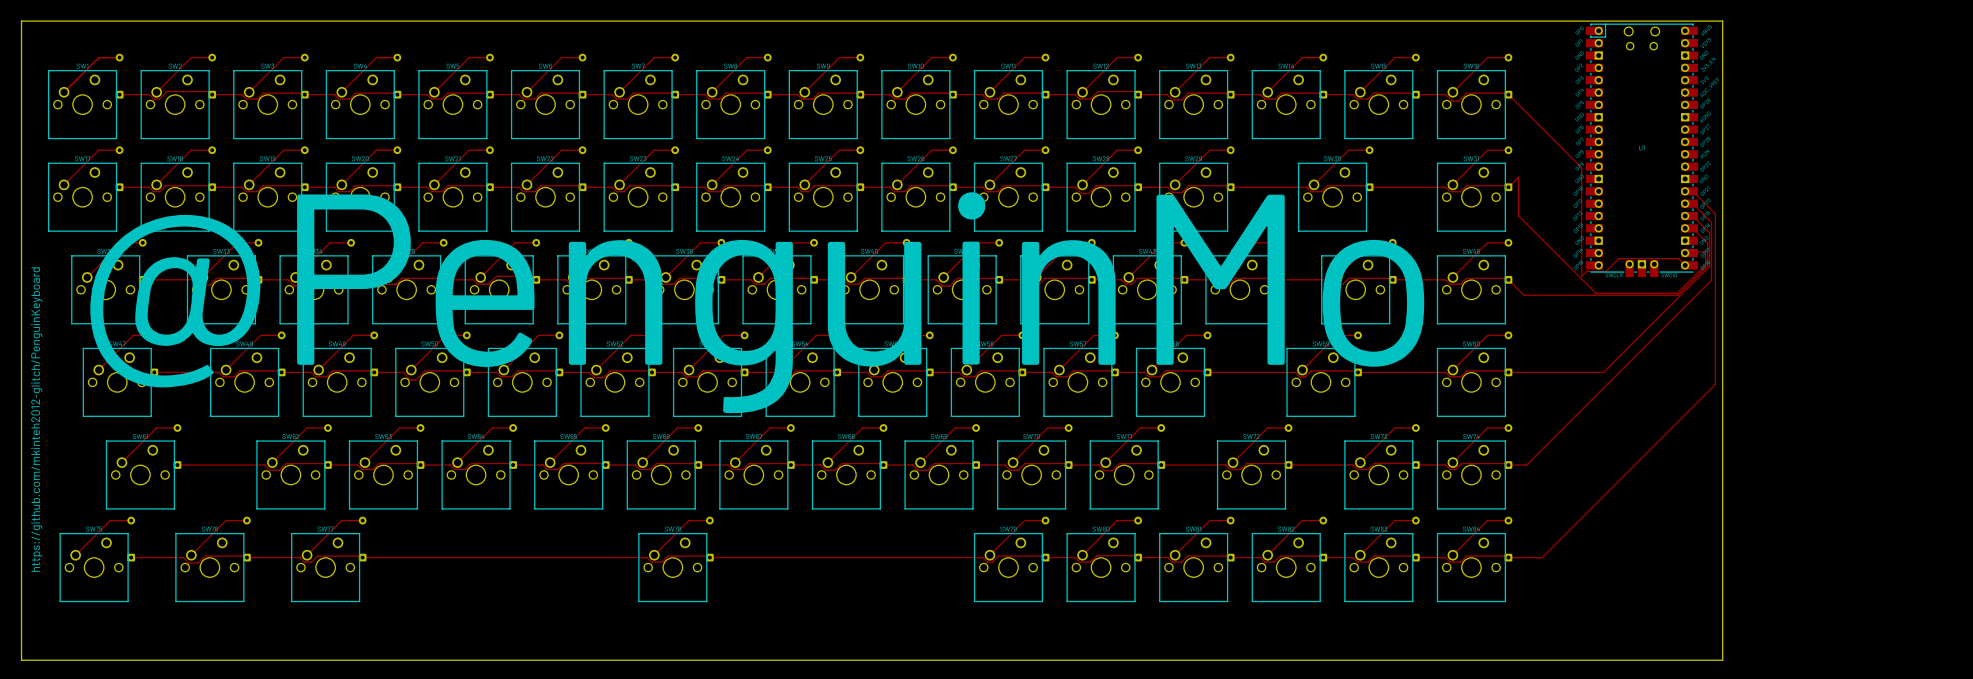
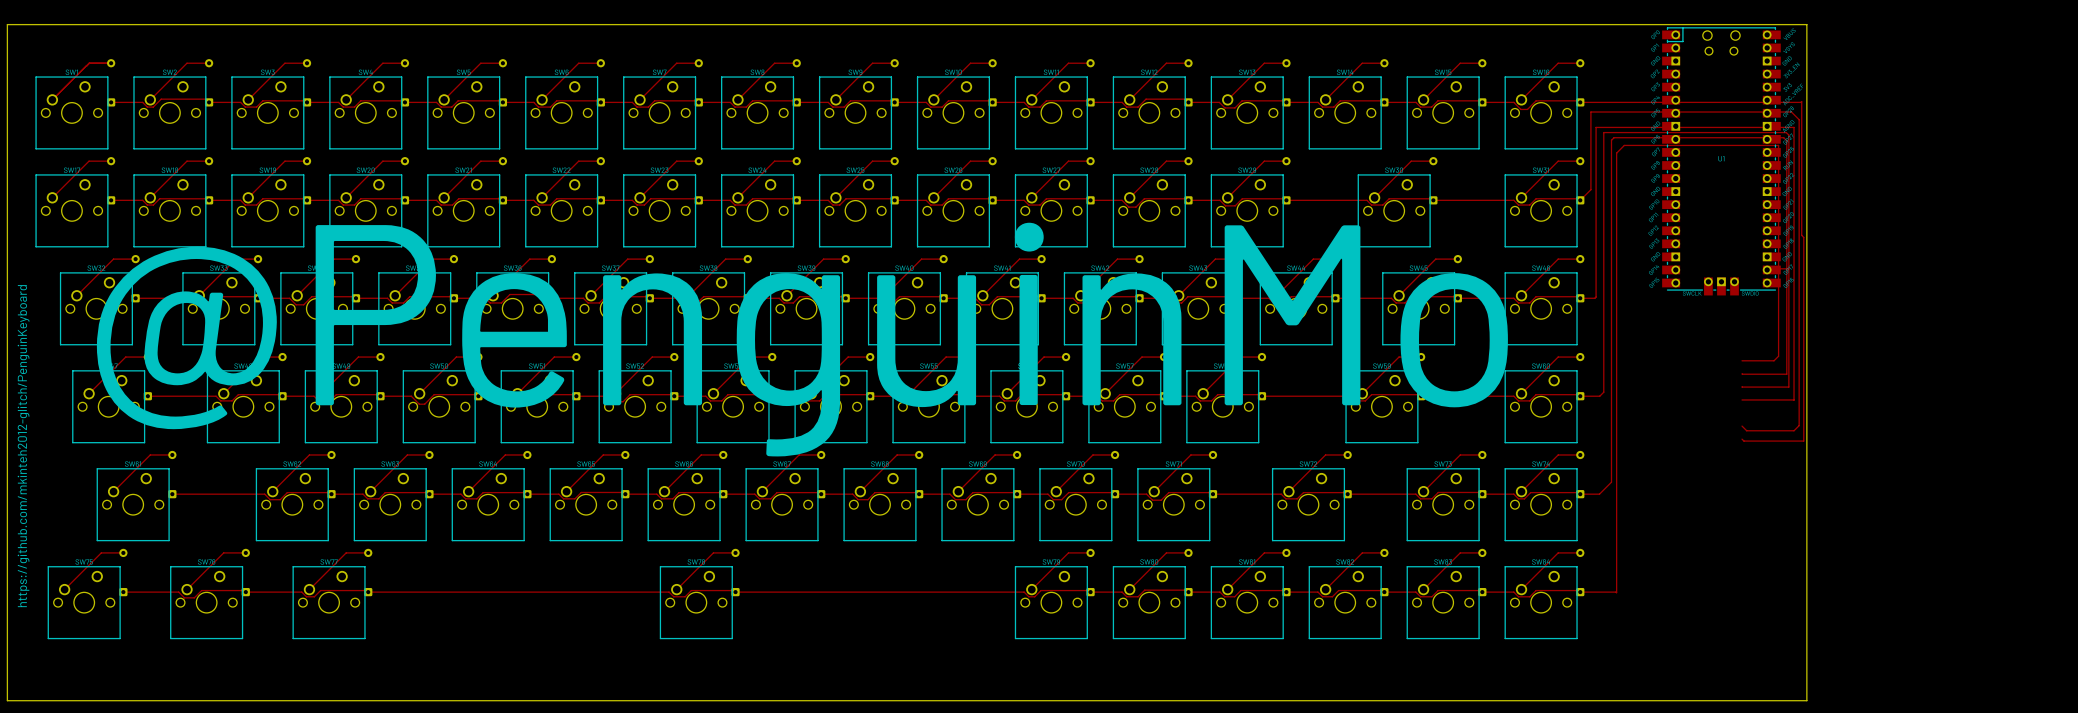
track: (1508, 94) (1581, 167) (1581, 276) (1586, 271) (1606, 271) (1618, 258) (1678, 258) (1685, 265) -> (1580, 102) (1801, 101) (1803, 441) (1743, 441) (1742, 439)
track: (1518, 177) (1518, 215) (1595, 293) (1677, 293) (1705, 264) -> (1590, 189) (1590, 112) (1791, 112) (1799, 119) (1799, 228)
track: (1685, 191) (1692, 191) (1715, 213) -> none
track: (1685, 203) (1692, 203) (1711, 222) (1711, 280) (1537, 453) -> (1742, 373) (1786, 374) (1786, 140) (1783, 137) (1614, 137) (1611, 140) (1611, 482)
track: (1685, 216) (1692, 216) (1709, 232) (1709, 266) (1603, 372) (1526, 372) -> (1788, 268) (1788, 135) (1786, 132) (1603, 132) (1603, 392) (1599, 396)
track: (1685, 228) (1692, 228) (1707, 243) (1707, 265) (1677, 295) (1523, 295) (1508, 279) -> (1794, 399) (1794, 127) (1596, 127) (1596, 297) (1580, 298)
track: none -> (1788, 282) (1788, 387) (1742, 386)
text position: @PenguinMo (757, 302) -> @PenguinMo (802, 339)
track: none -> (1742, 399) (1794, 399)
track: (1715, 384) (1542, 557) -> (1742, 360) (1774, 360) (1778, 356) (1778, 145) (1624, 145) (1616, 153) (1616, 592)
track: none -> (1799, 408) (1799, 425) (1794, 430) (1746, 430) (1742, 426)

